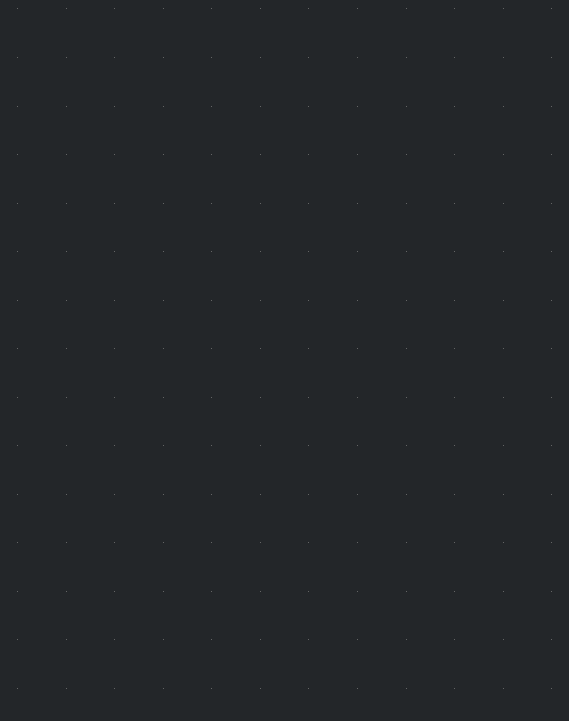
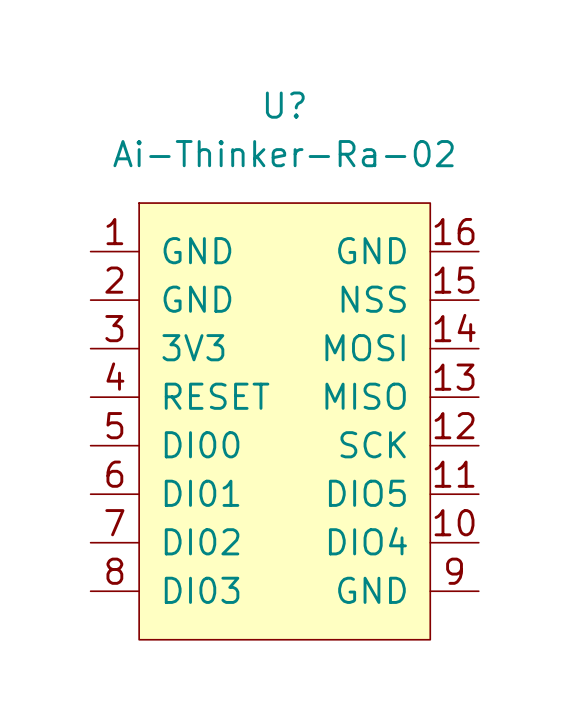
U?: none -> Ai-Thinker-Ra-02 (284, 421)

